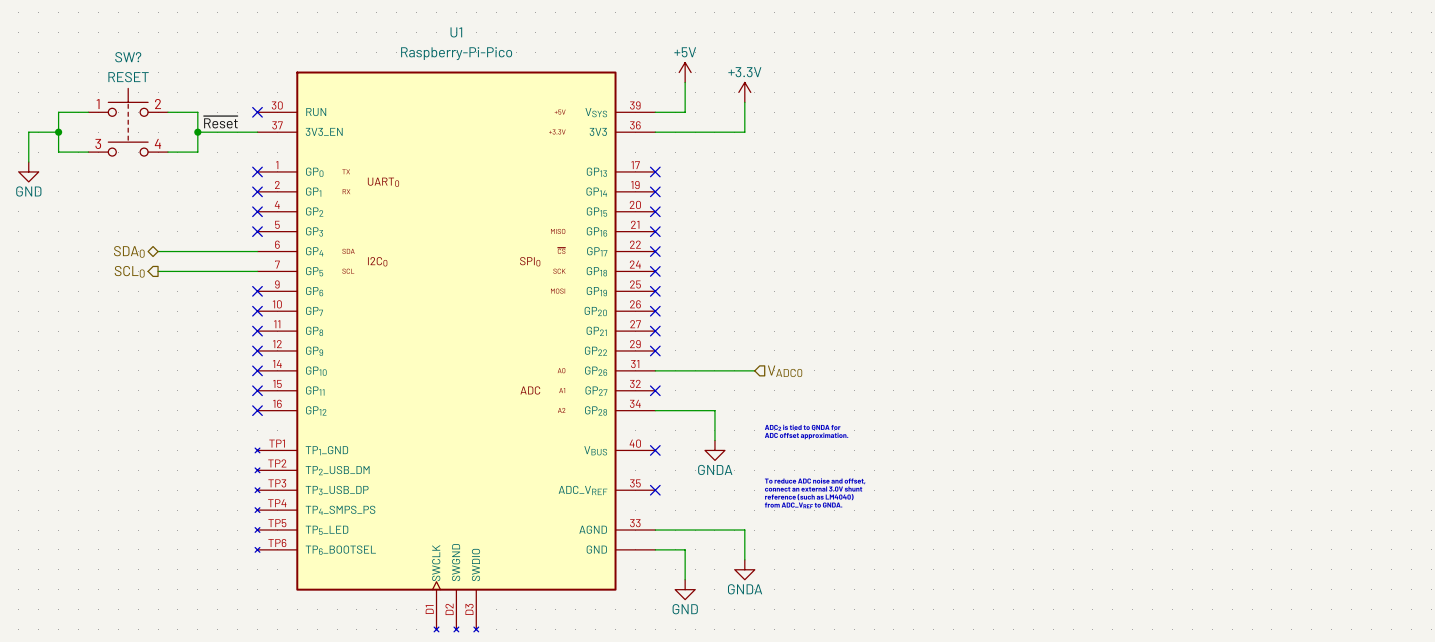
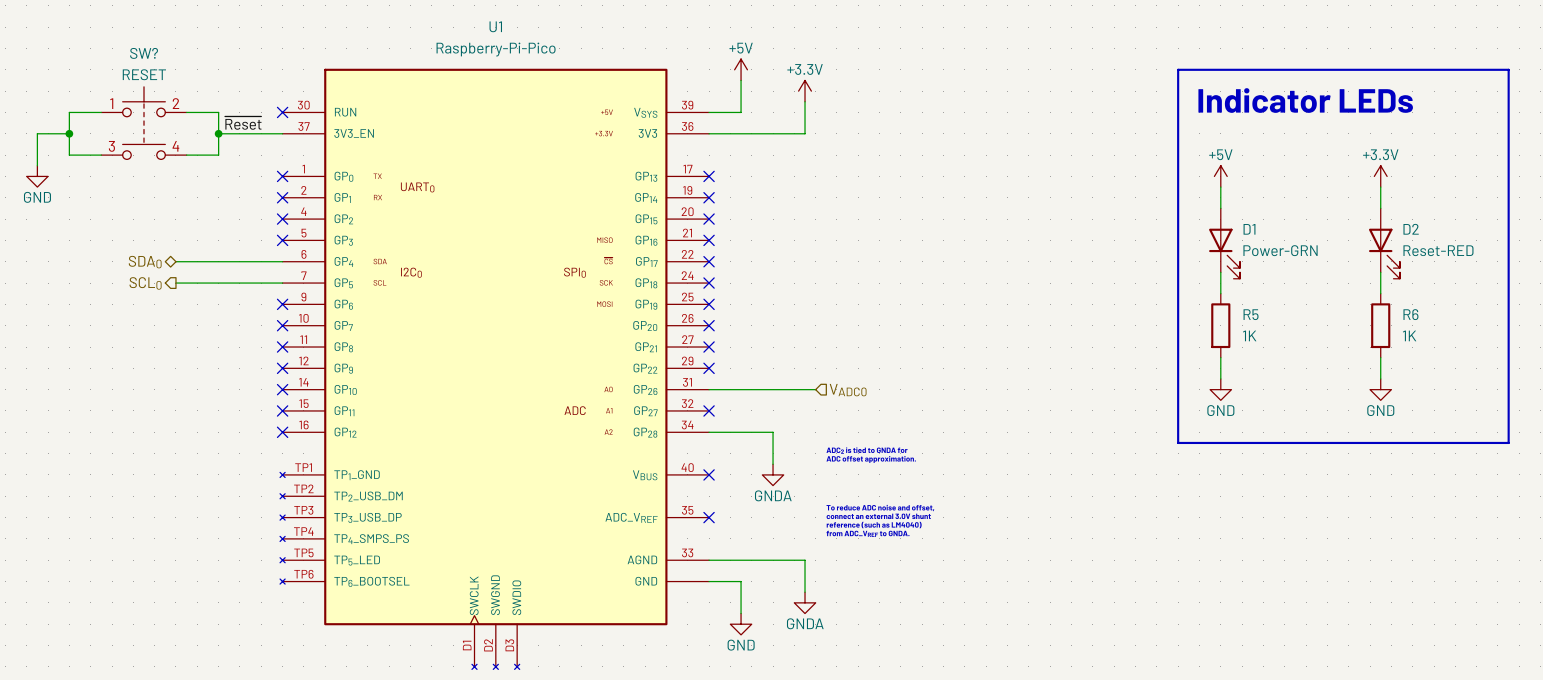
line: none -> (1178, 69) (1508, 69) (1508, 442) (1178, 442) (1178, 69)
text: none -> Indicator LEDs (1305, 100)
power symbol: none -> +5V (1220, 176)
power symbol: none -> +3.3V (1380, 176)
wire: none -> (1220, 187) (1220, 208)
wire: none -> (1380, 187) (1380, 208)
D1: none -> Power-GRN (1224, 243)
D2: none -> Reset-RED (1384, 243)
wire: none -> (1220, 272) (1220, 293)
wire: none -> (1380, 272) (1380, 293)
R5: none -> 1K (1220, 325)
R6: none -> 1K (1380, 325)
wire: none -> (1220, 357) (1220, 378)
wire: none -> (1380, 357) (1380, 378)
power symbol: none -> GND (1220, 389)
power symbol: none -> GND (1380, 389)

